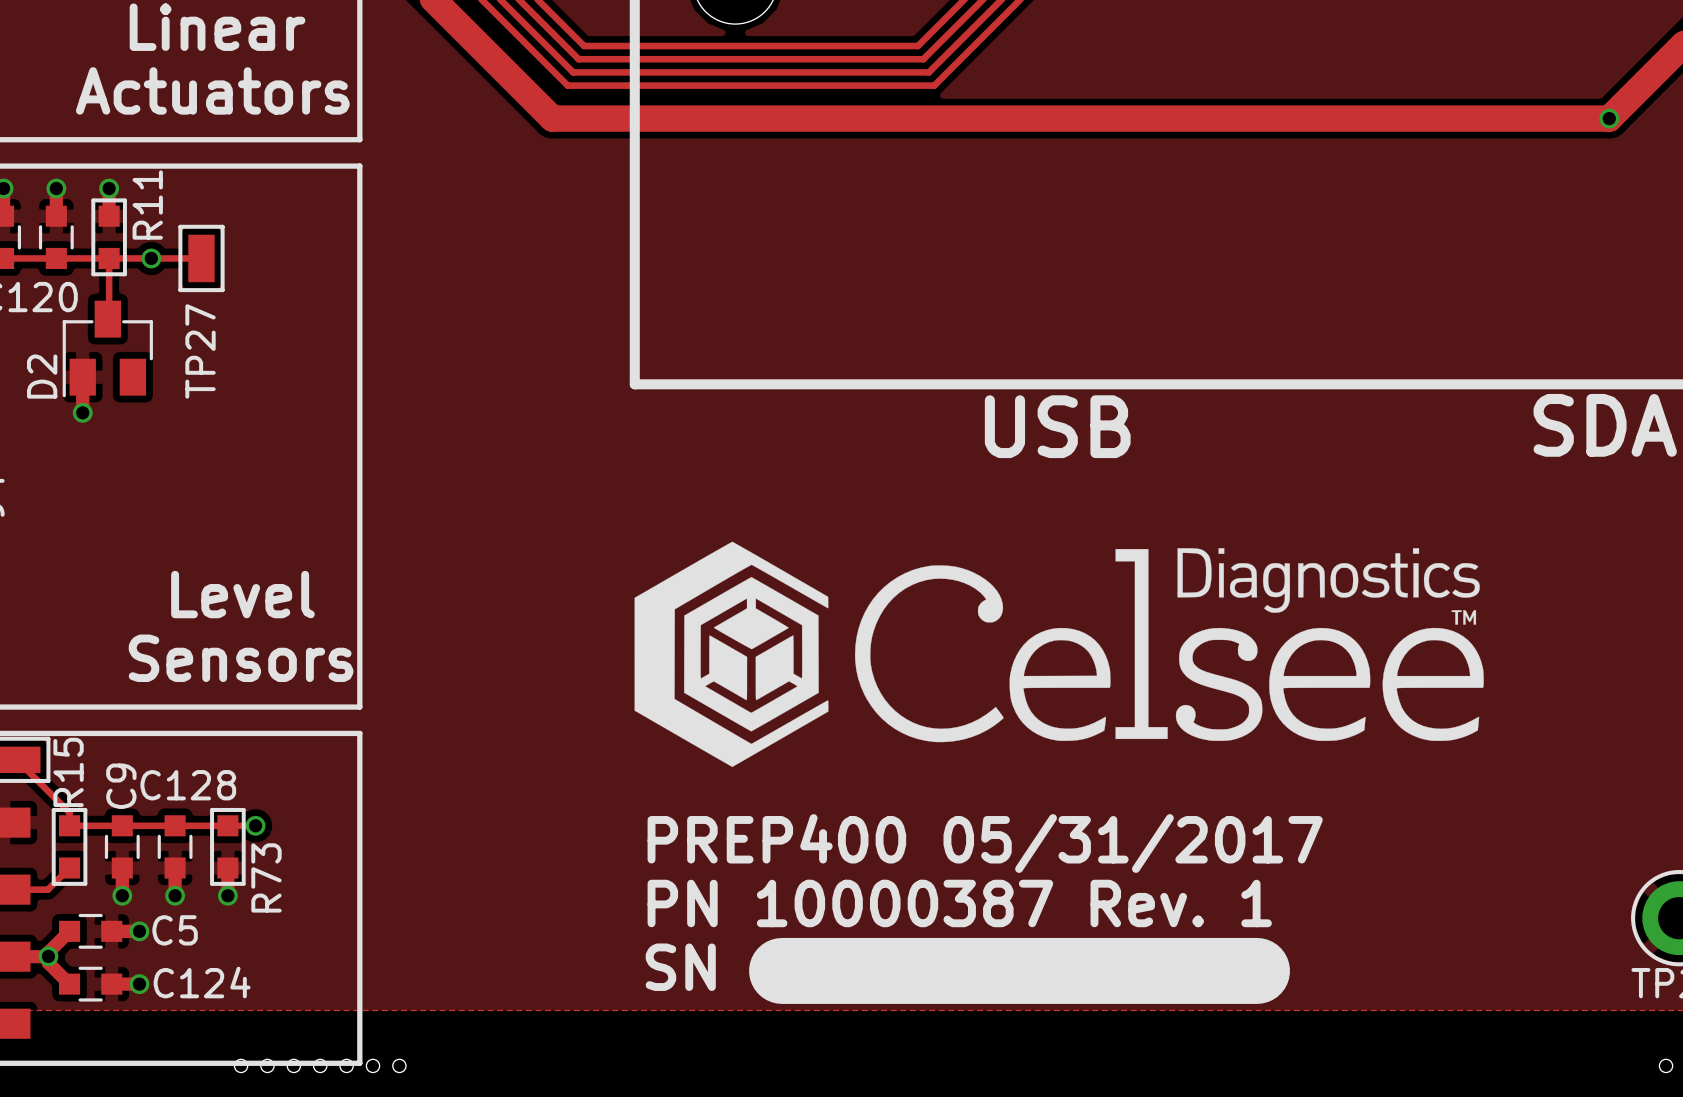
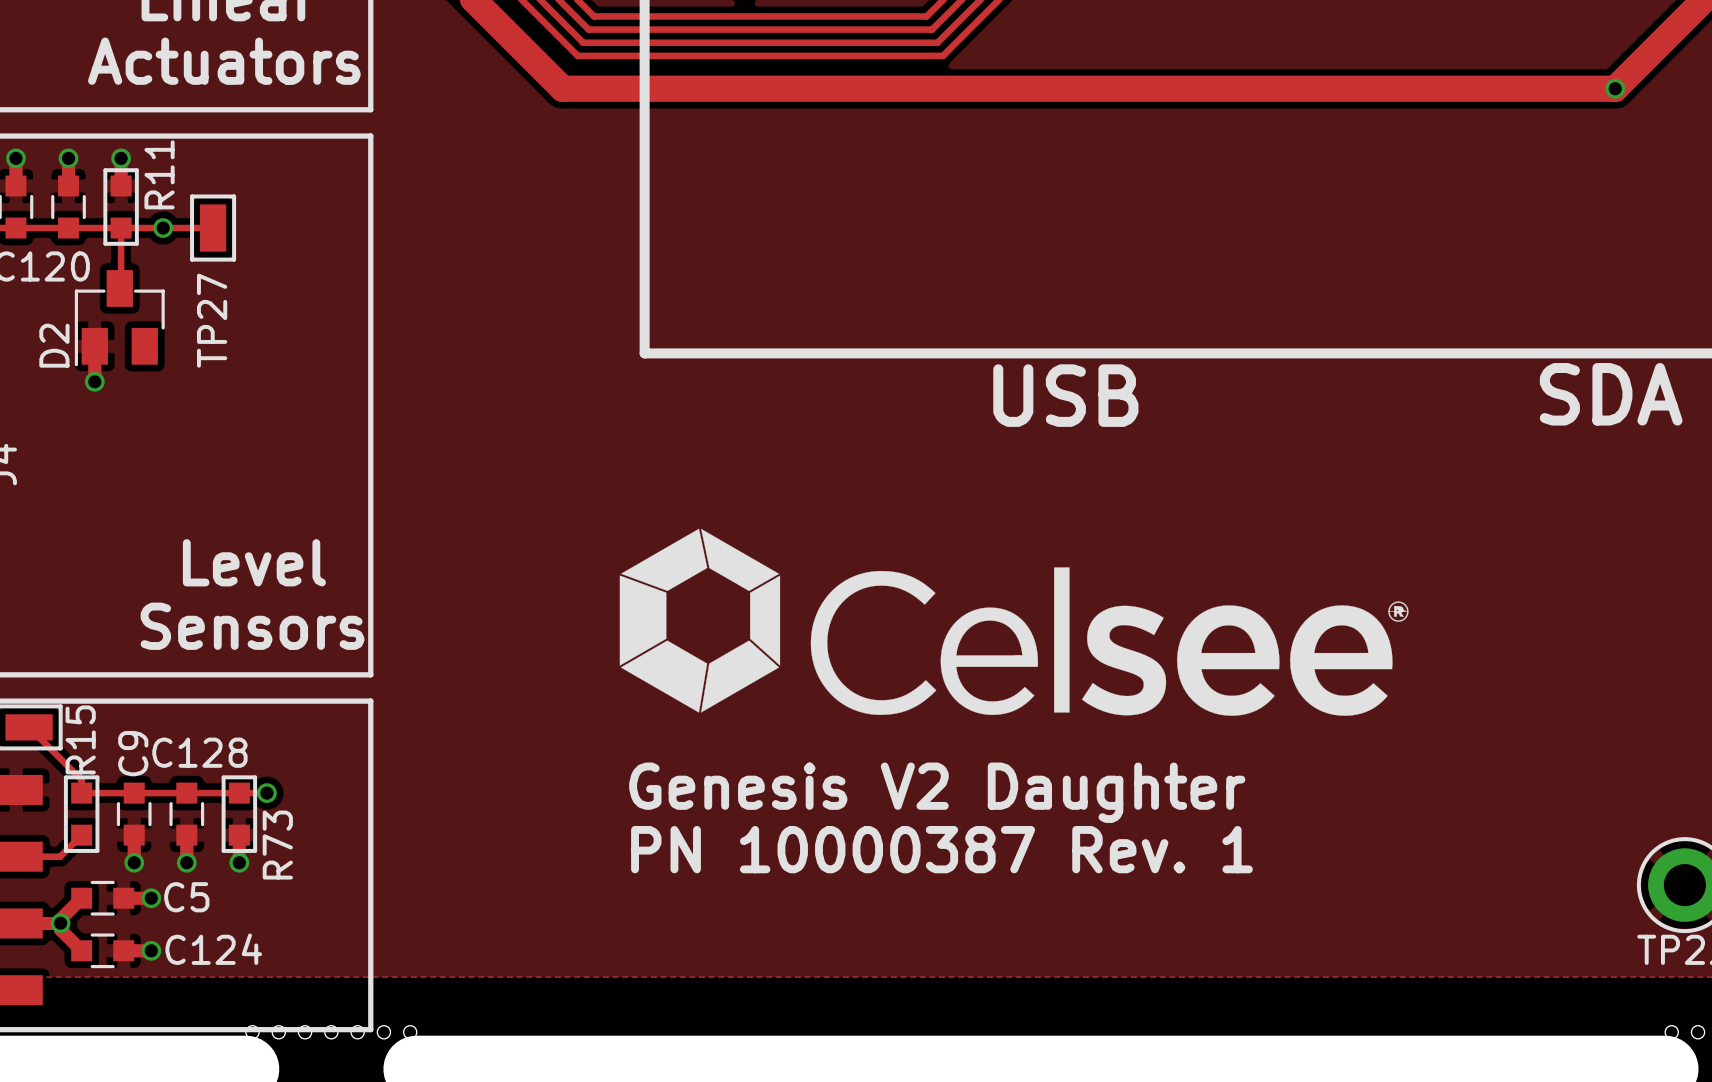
drawing: [634, 541, 1484, 767] -> none
drawing: none -> [619, 528, 1409, 716]
text: none -> Genesis V2 Daughter (937, 792)
text: PREP400 05/31/2017 (985, 843) -> none
text position: PN 10000387 Rev. 1 (959, 903) -> PN 10000387 Rev. 1 (941, 849)
text: SN (680, 967) -> none
line: (782, 970) (1257, 970) -> none

